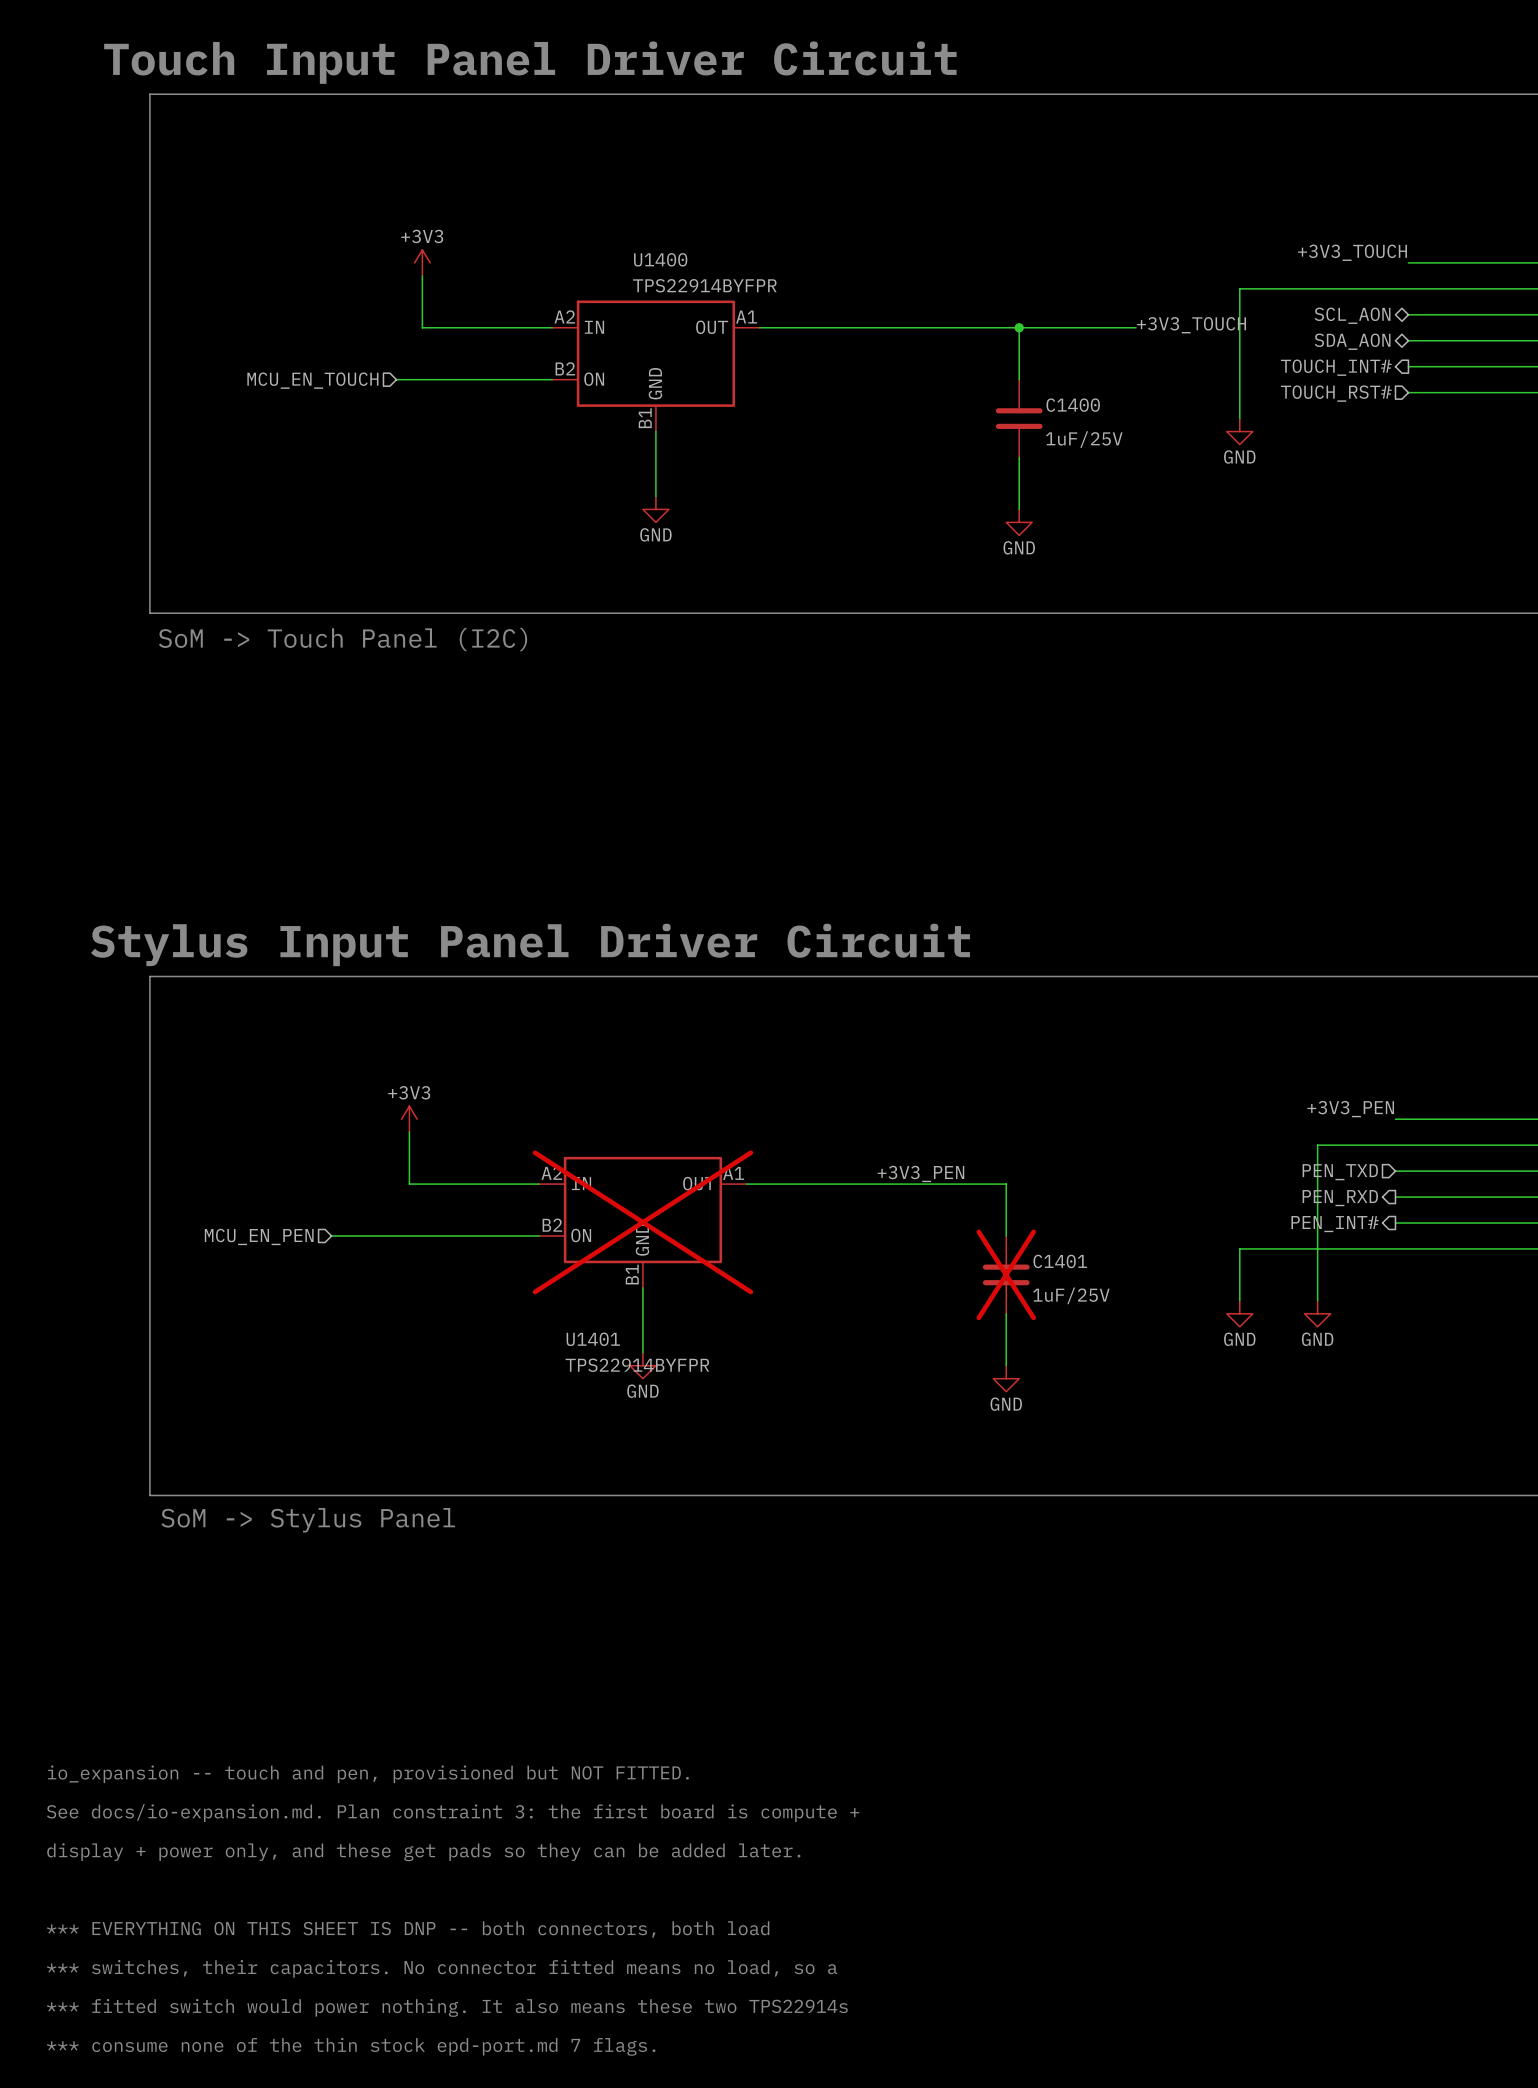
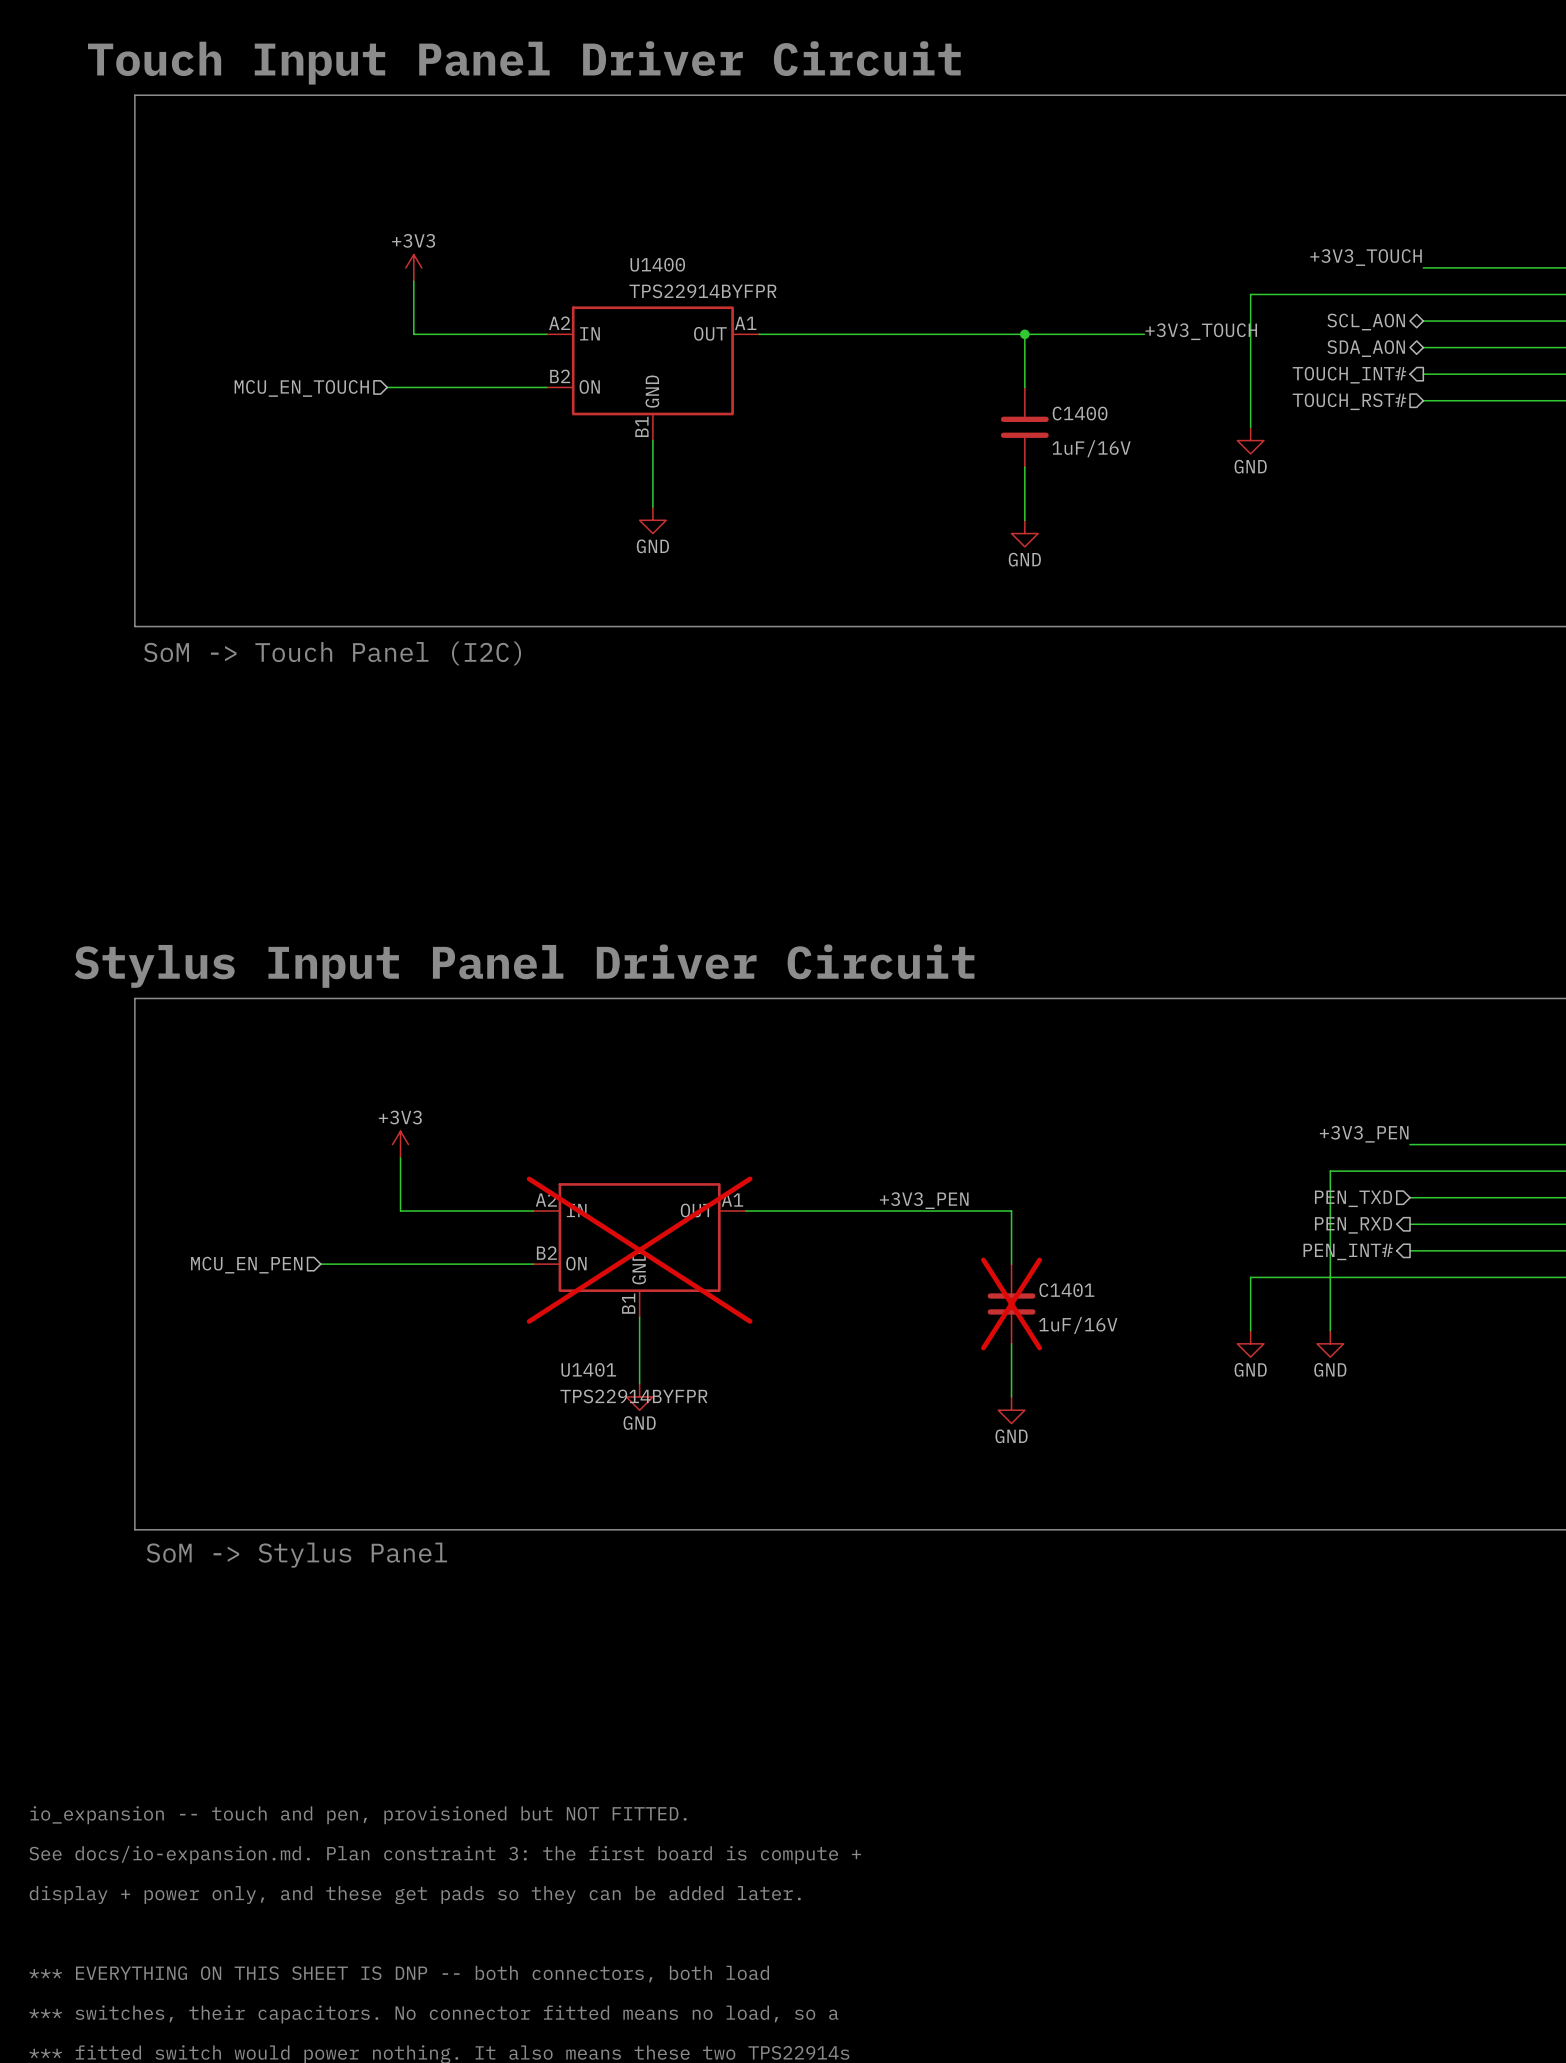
C1400 value: 1uF/25V (1084, 439) -> 1uF/16V (1091, 448)
C1401 value: 1uF/25V (1071, 1295) -> 1uF/16V (1078, 1325)

